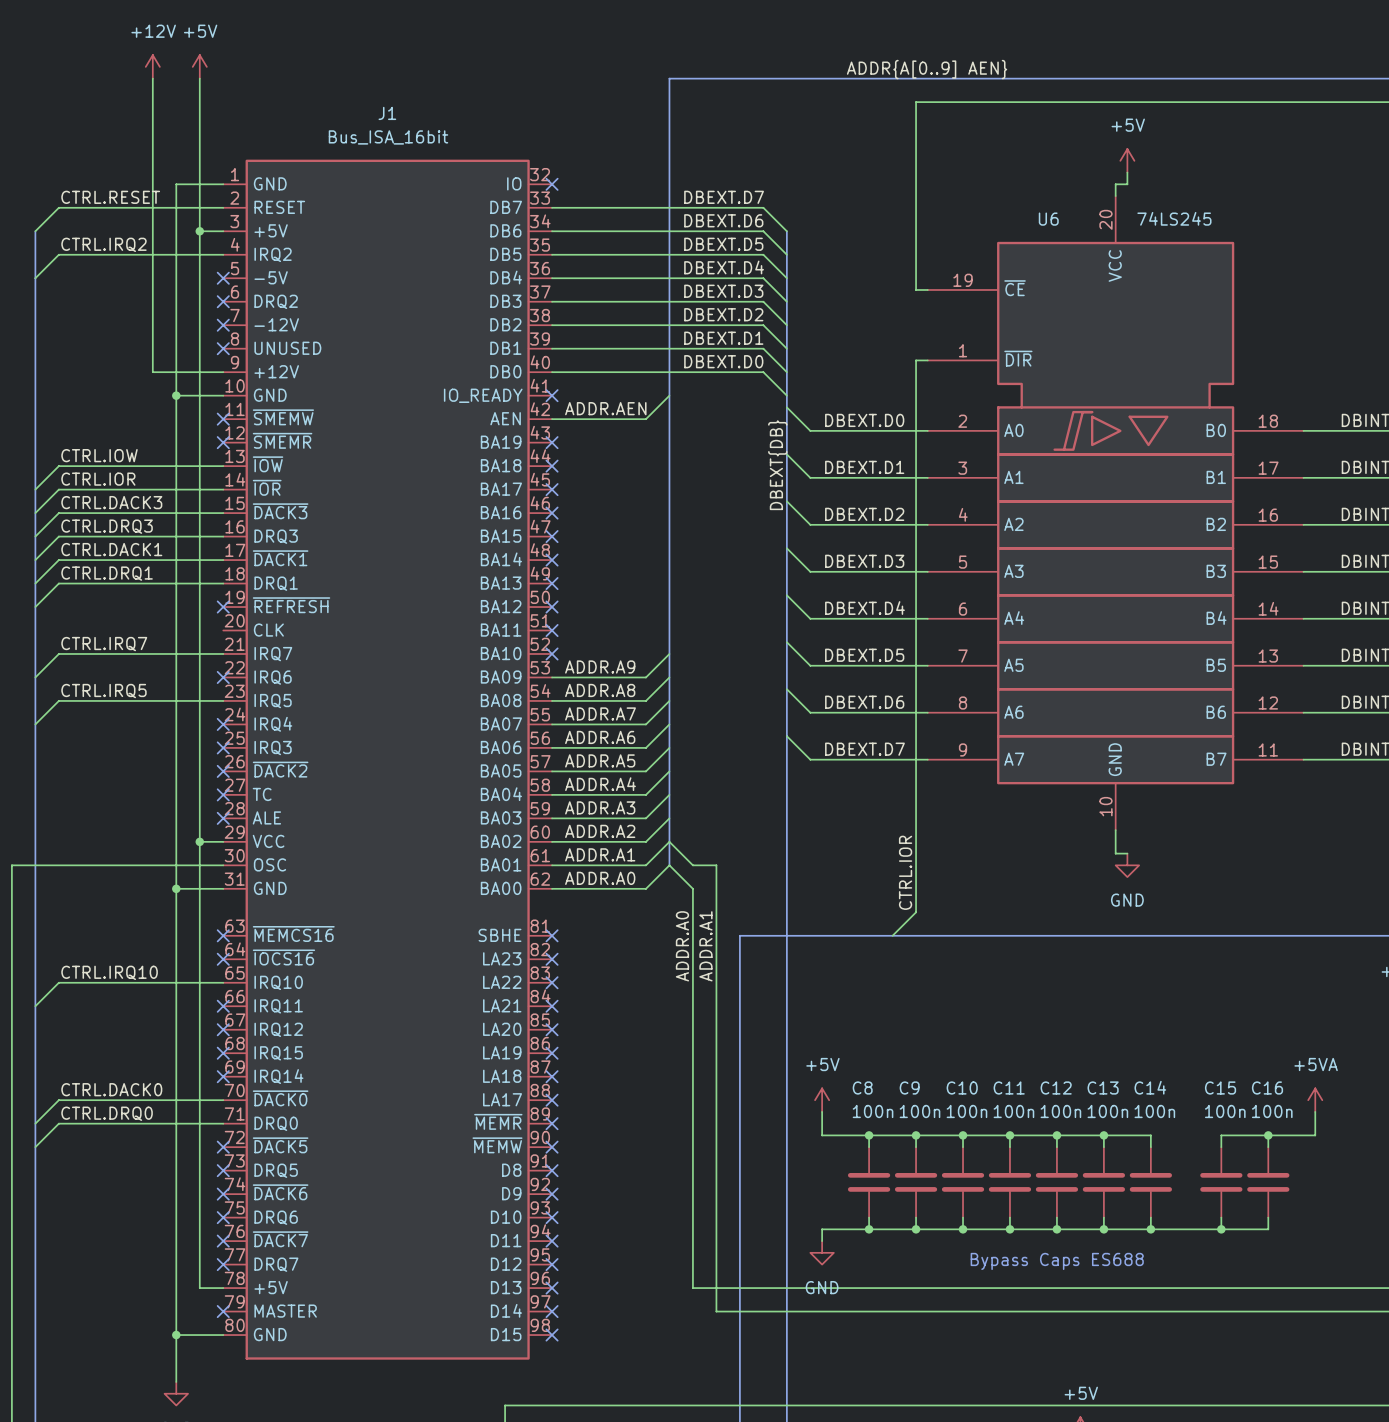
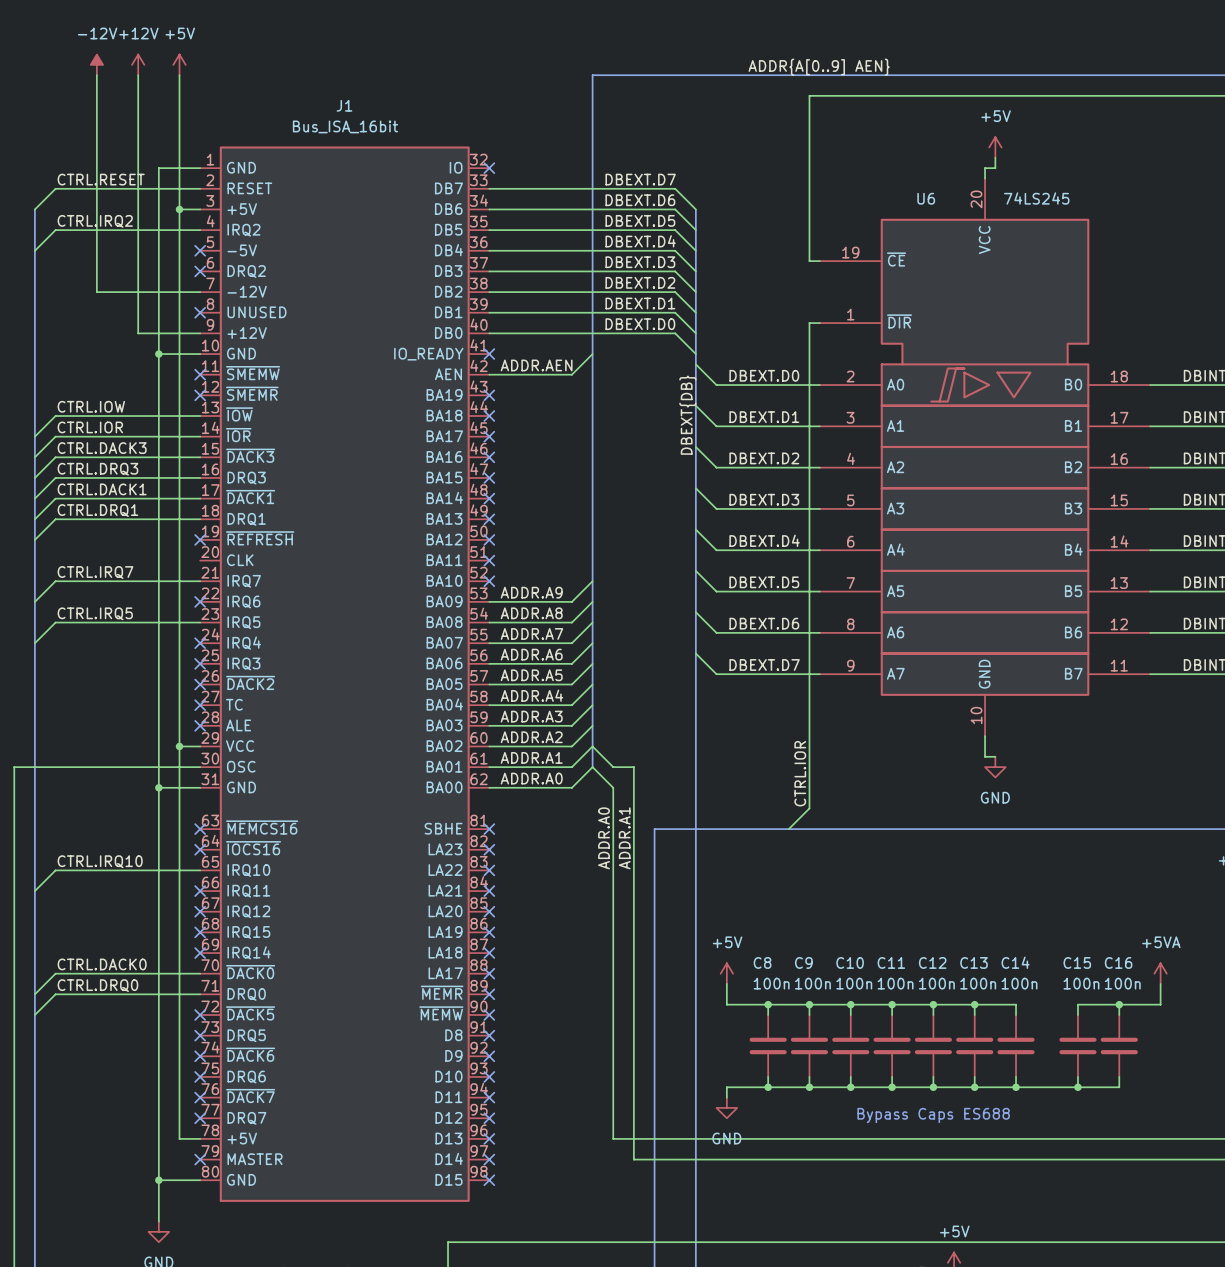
power symbol: none -> -12V (96, 64)
wire: none -> (96, 75) (96, 292) (200, 292)
no-connect mark: (223, 325) -> none

